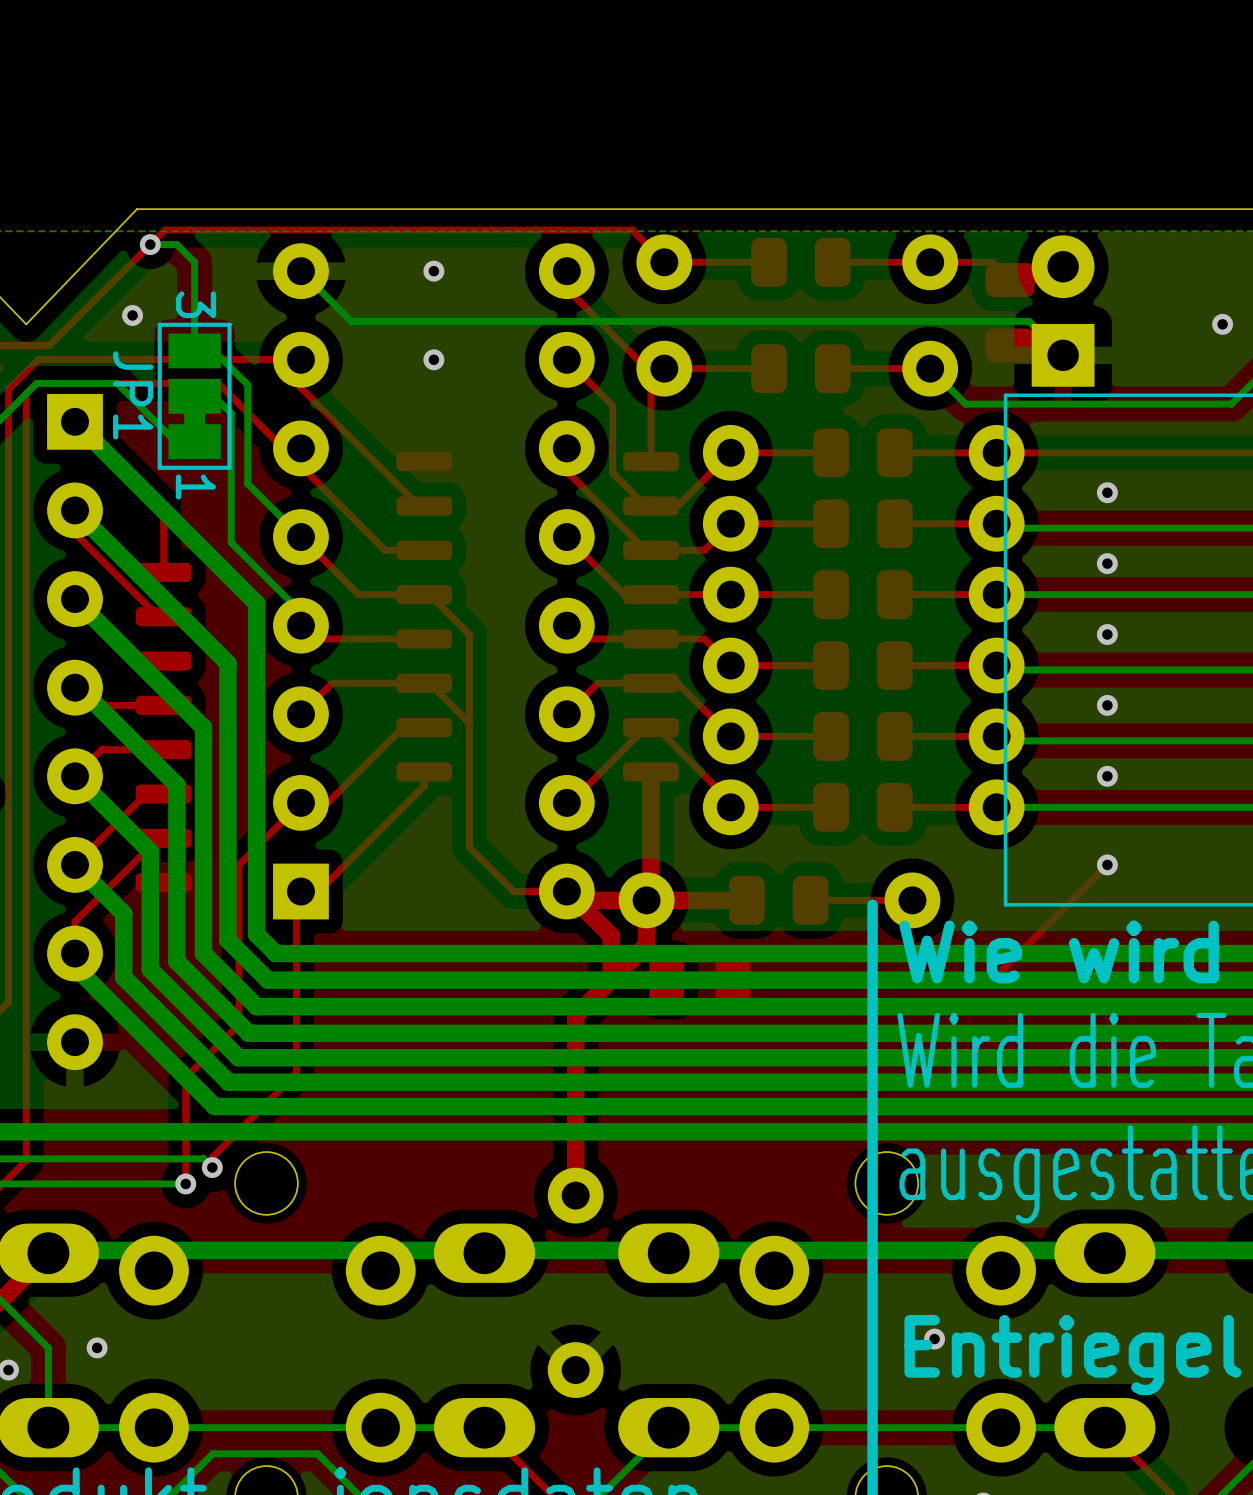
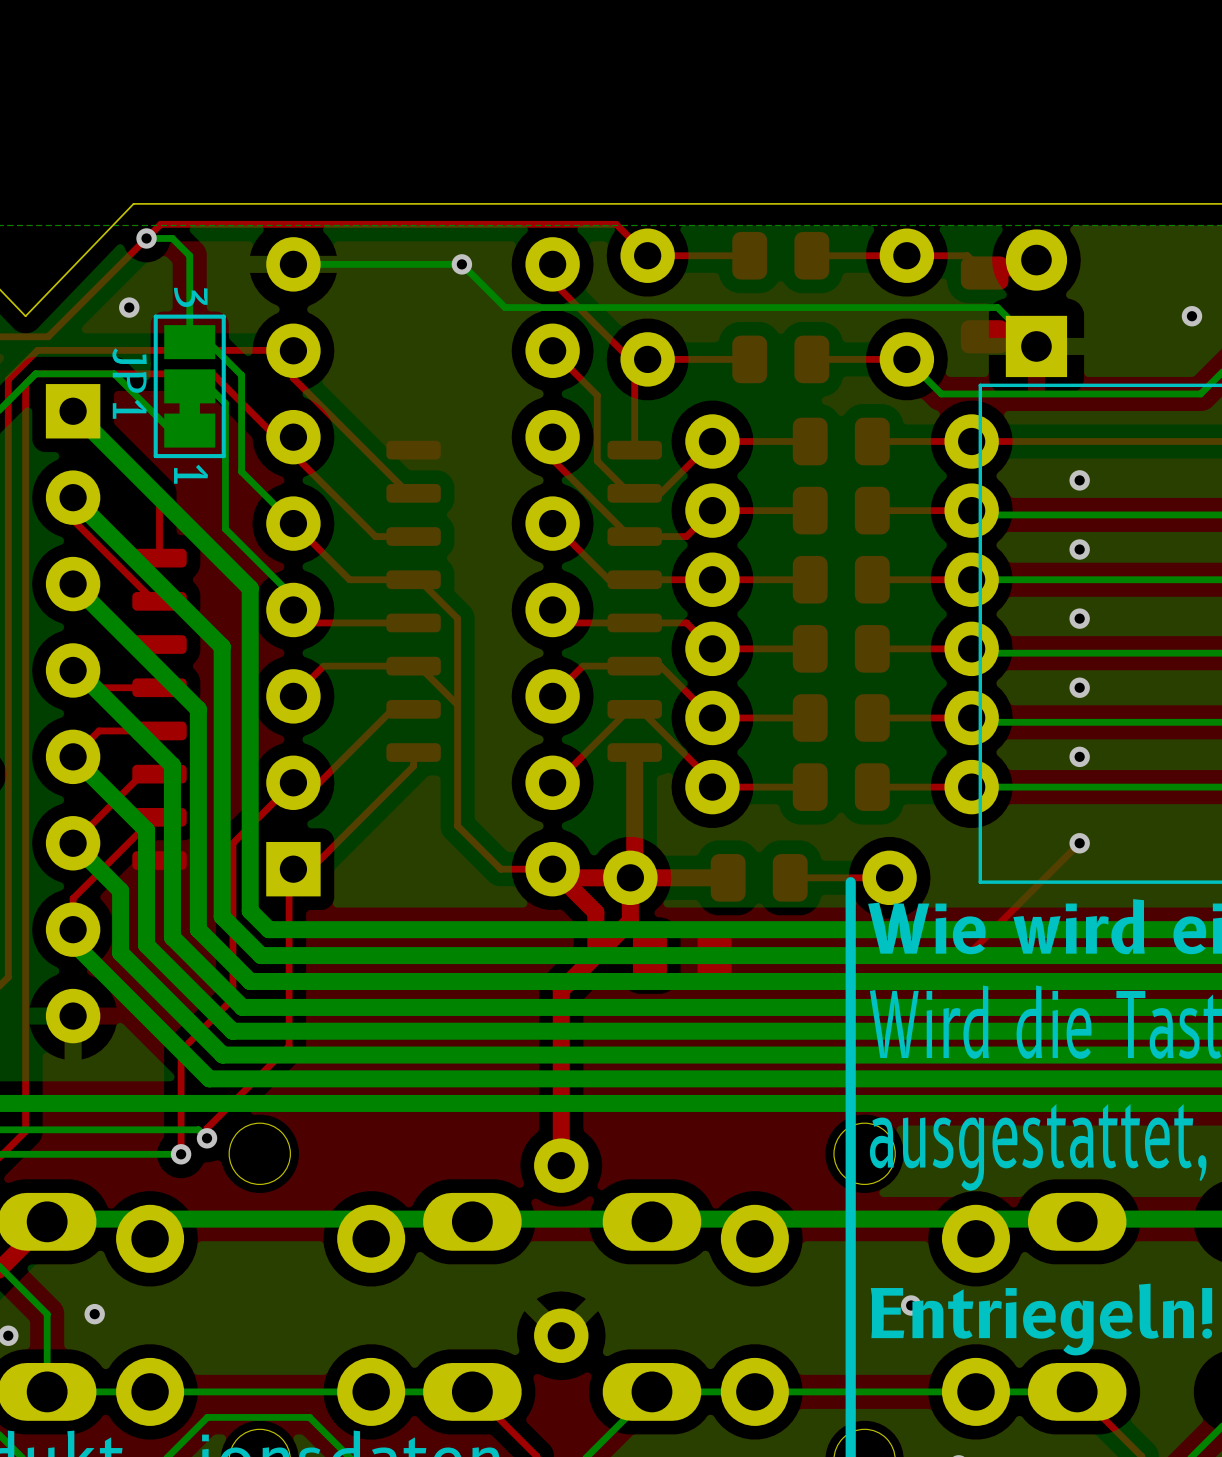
bottom track: (300, 271) (351, 321) (1029, 321) -> (293, 264) (461, 264) (505, 307) (997, 307) (1003, 313)
via position: (433, 271) -> (461, 264)
via: (433, 359) -> none

